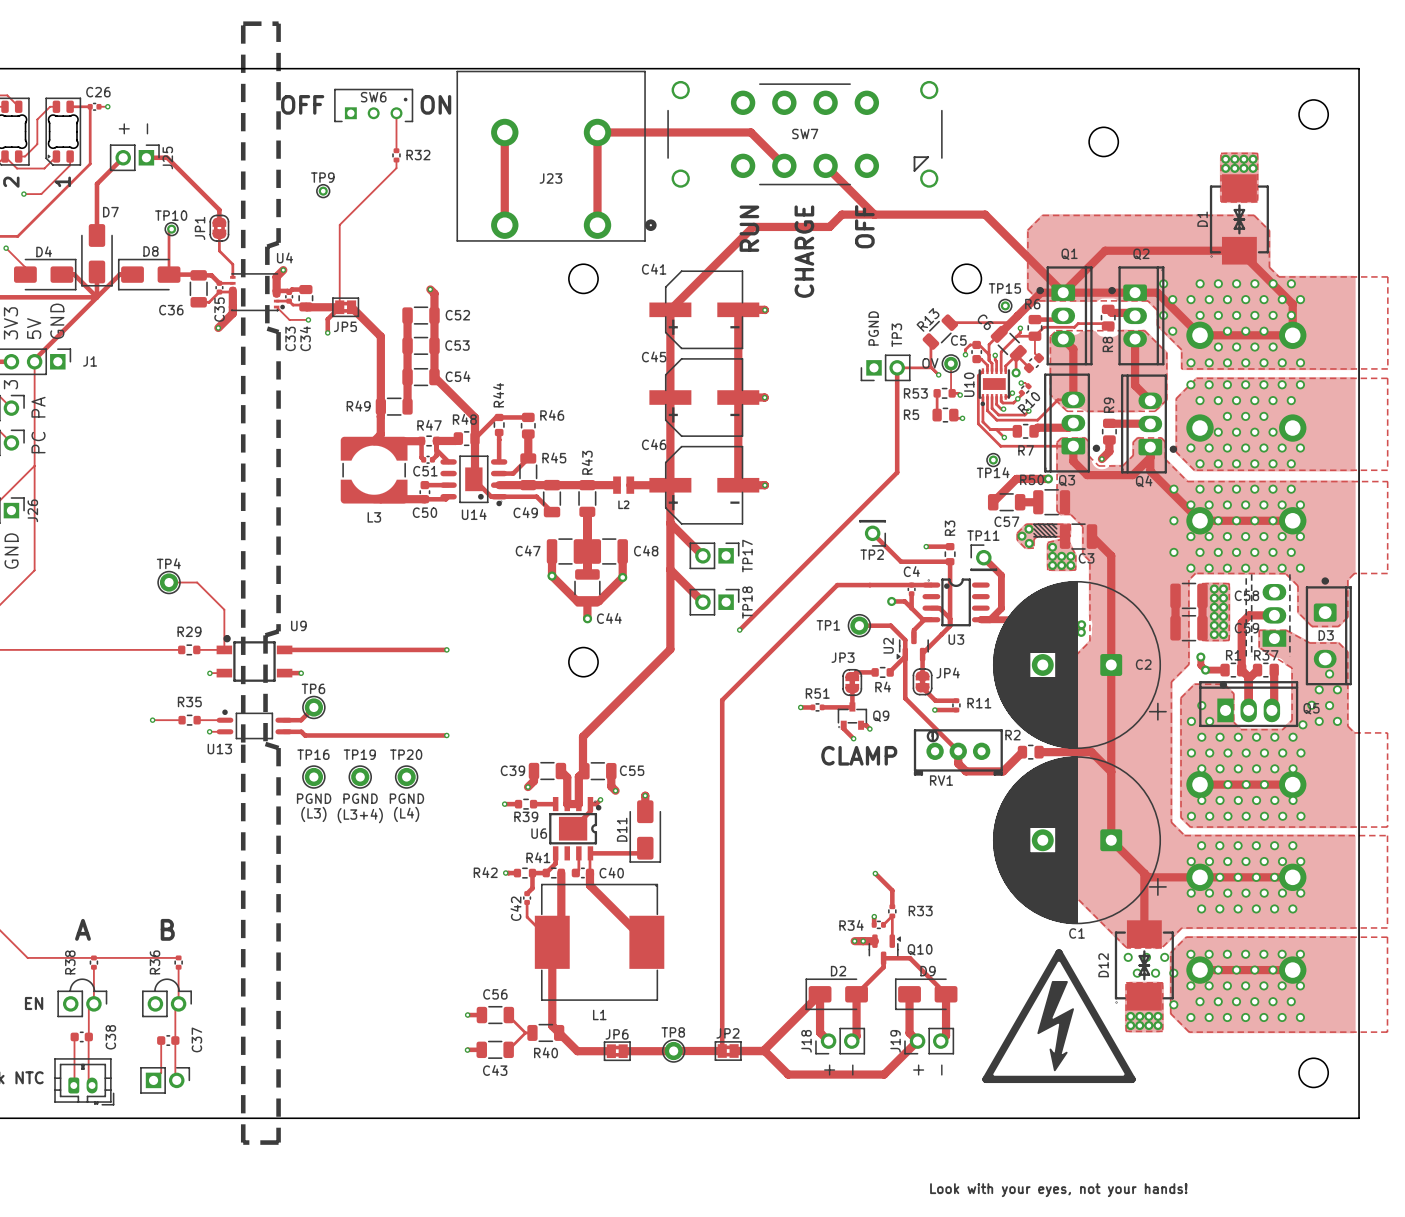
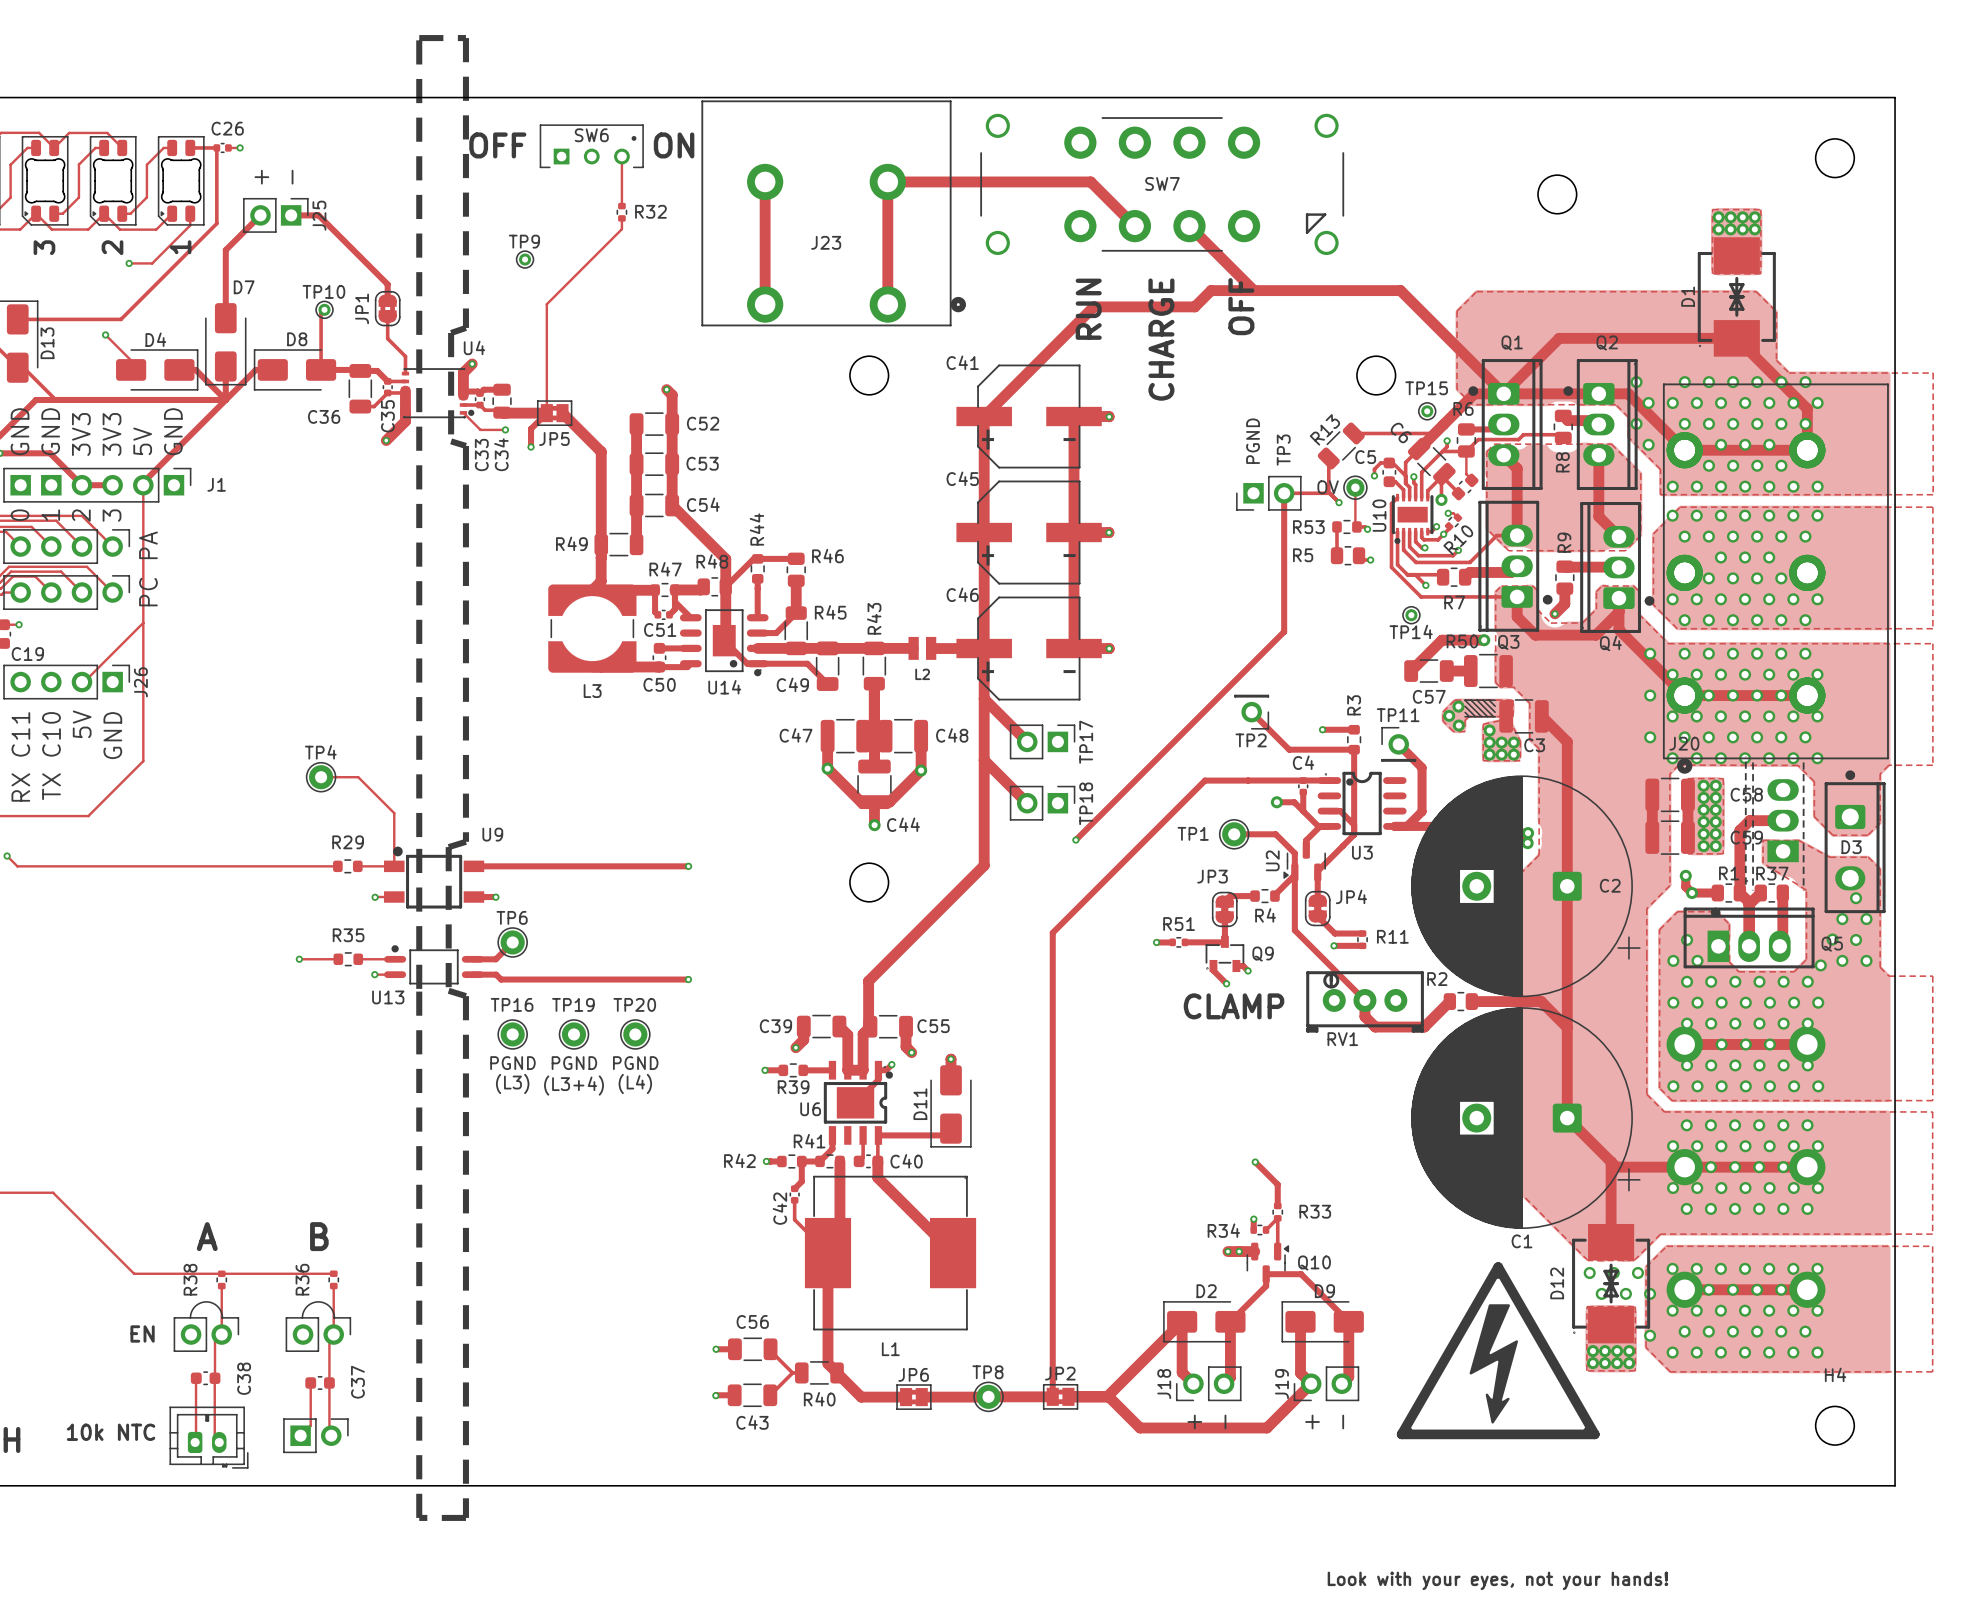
J20: none -> (1775, 578)
part footprint: [1245, 573, 1291, 658] -> [1744, 755, 1805, 892]
H4 name: none -> H4 (1835, 1374)

